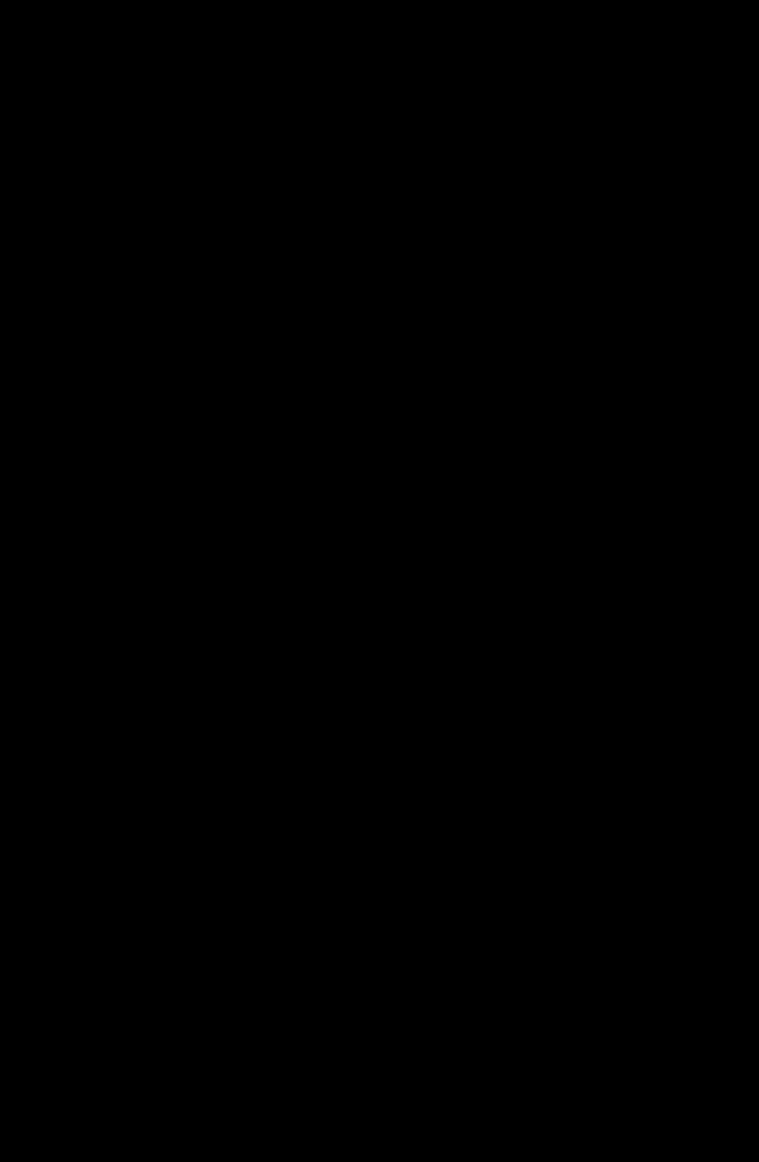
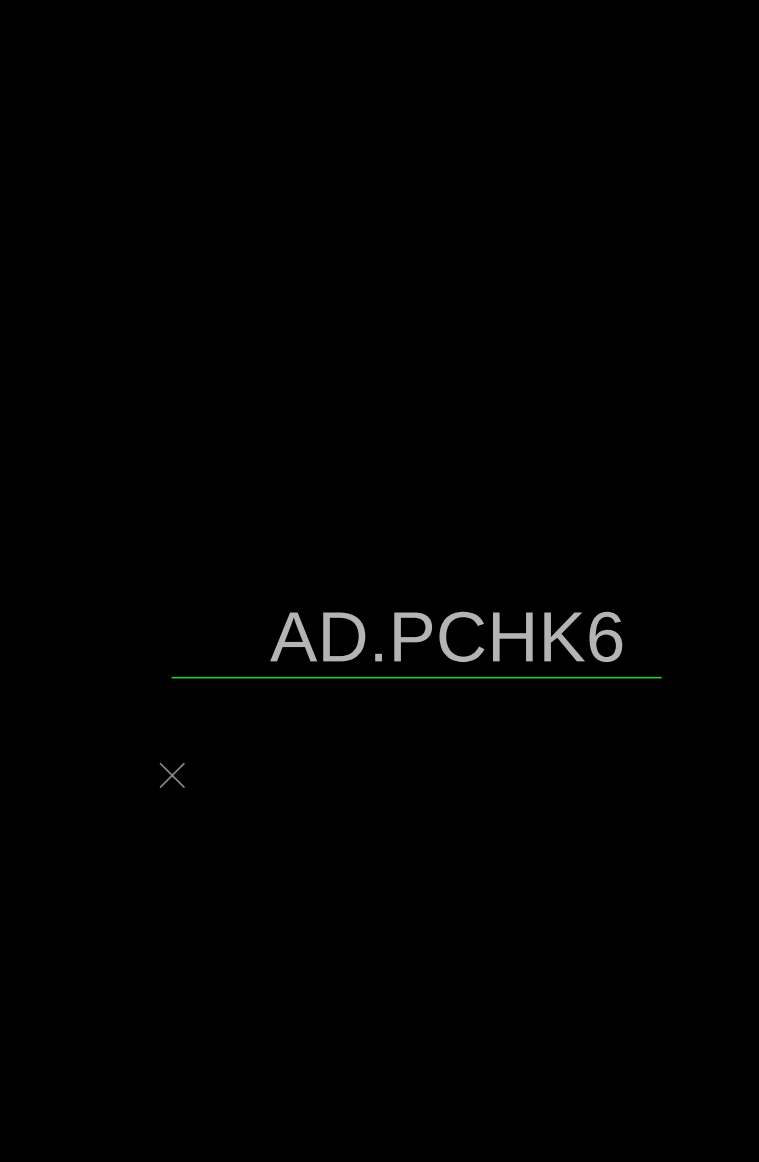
label: none -> AD.PCHK6 (446, 636)
wire: none -> (172, 677) (661, 677)
no-connect mark: none -> (172, 775)

